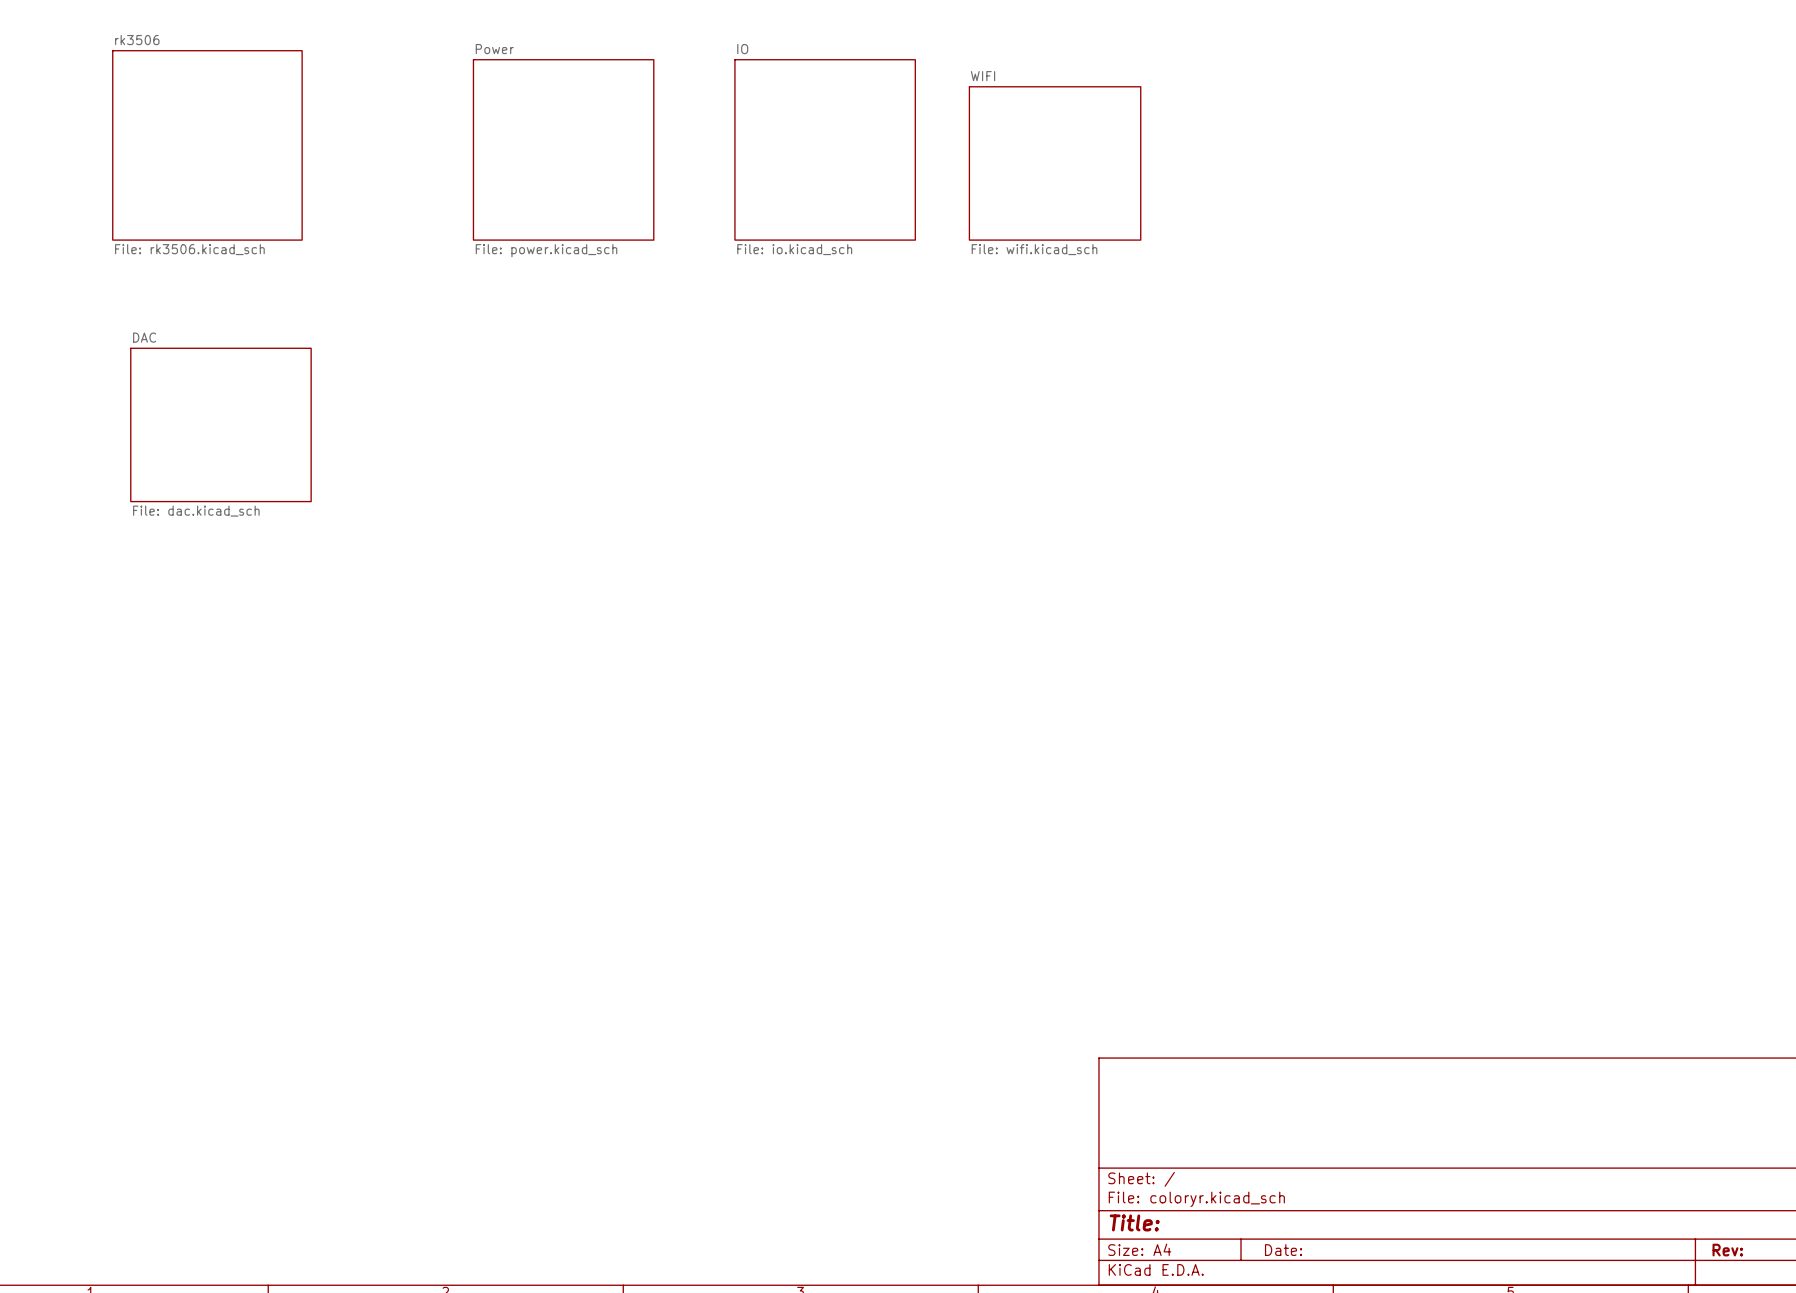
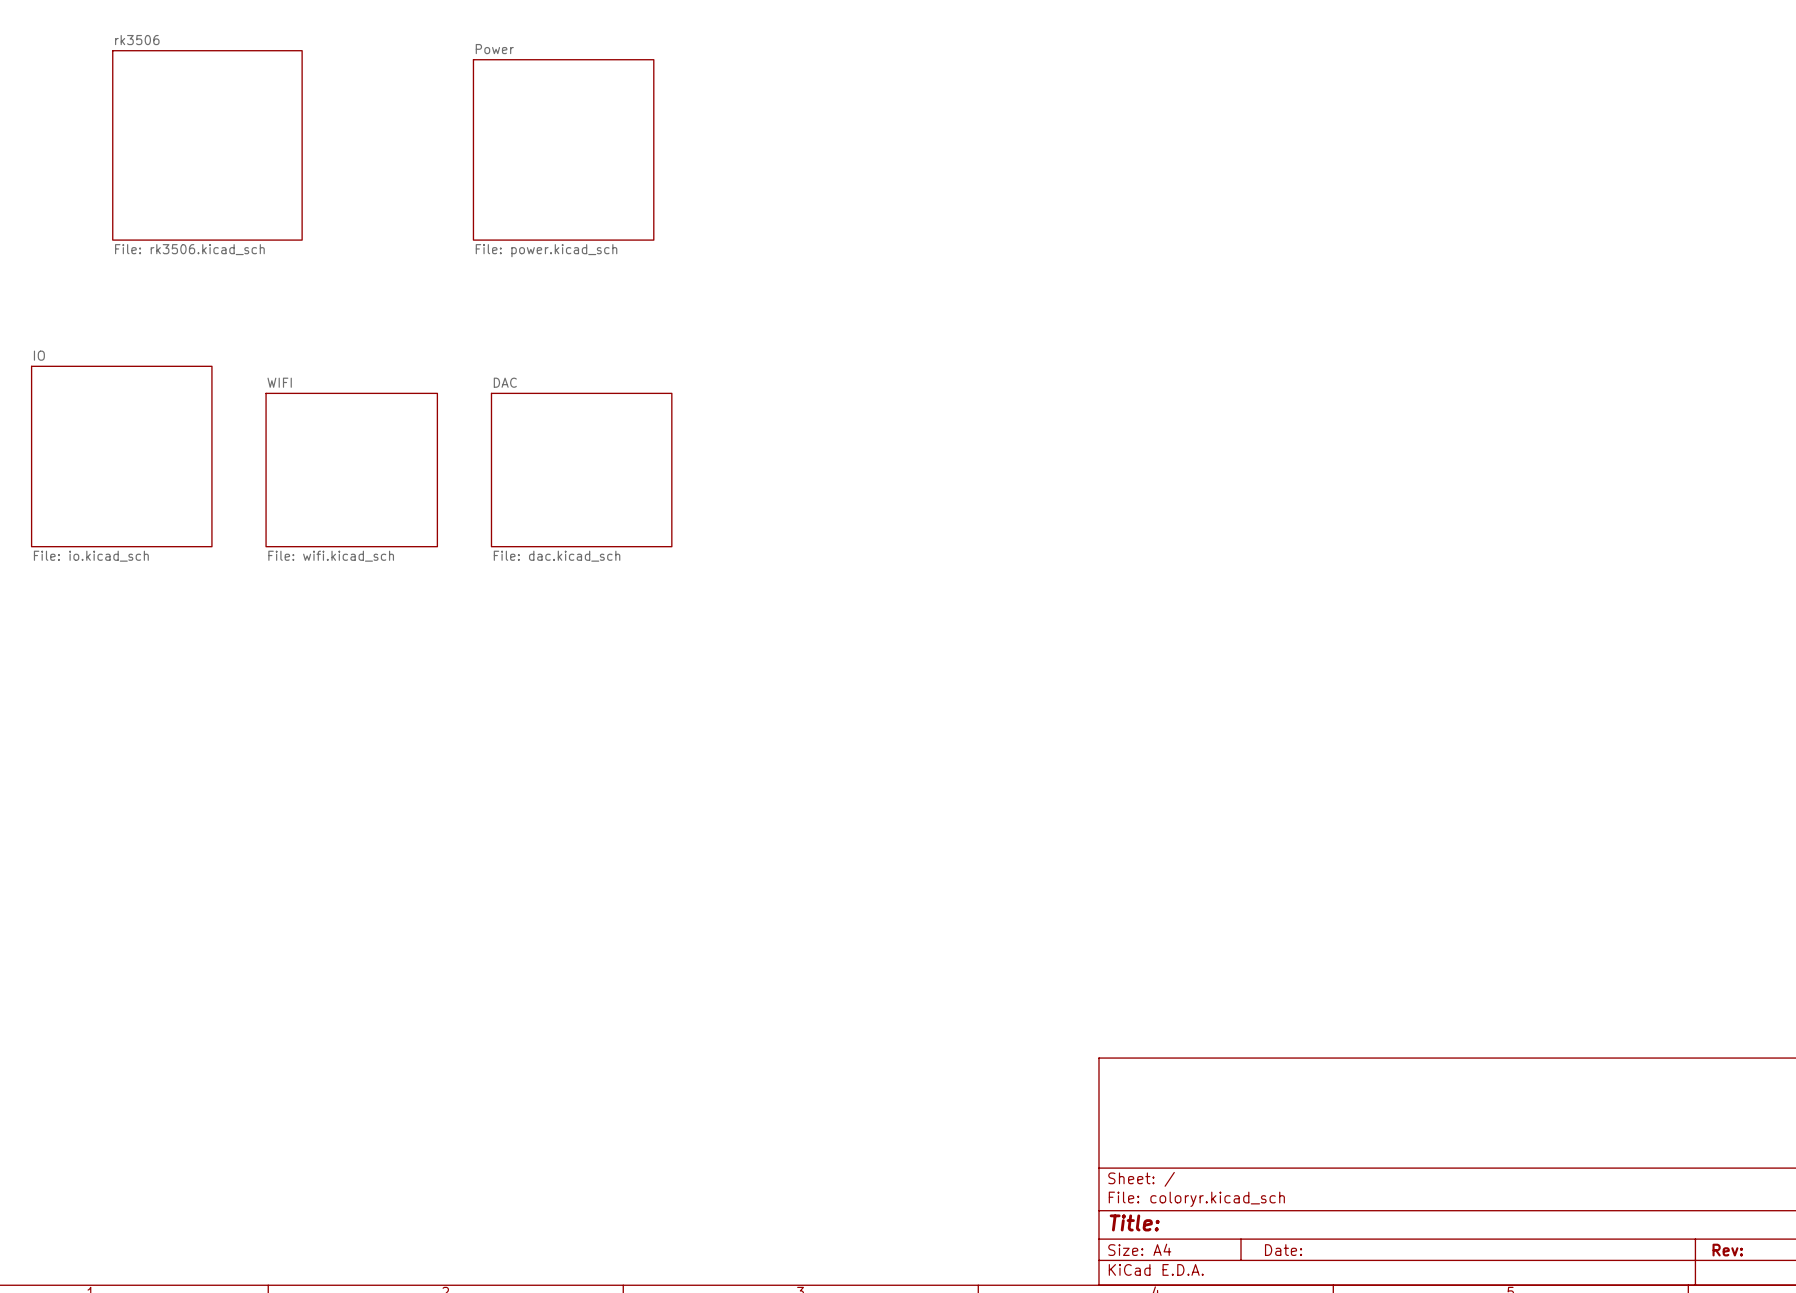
sheet IO: File: io.kicad_sch (825, 149) -> none
sheet WIFI: File: wifi.kicad_sch (1055, 163) -> none
sheet DAC: File: dac.kicad_sch (220, 424) -> none
sheet IO: none -> File: io.kicad_sch (121, 456)
sheet WIFI: none -> File: wifi.kicad_sch (351, 470)
sheet DAC: none -> File: dac.kicad_sch (581, 470)

